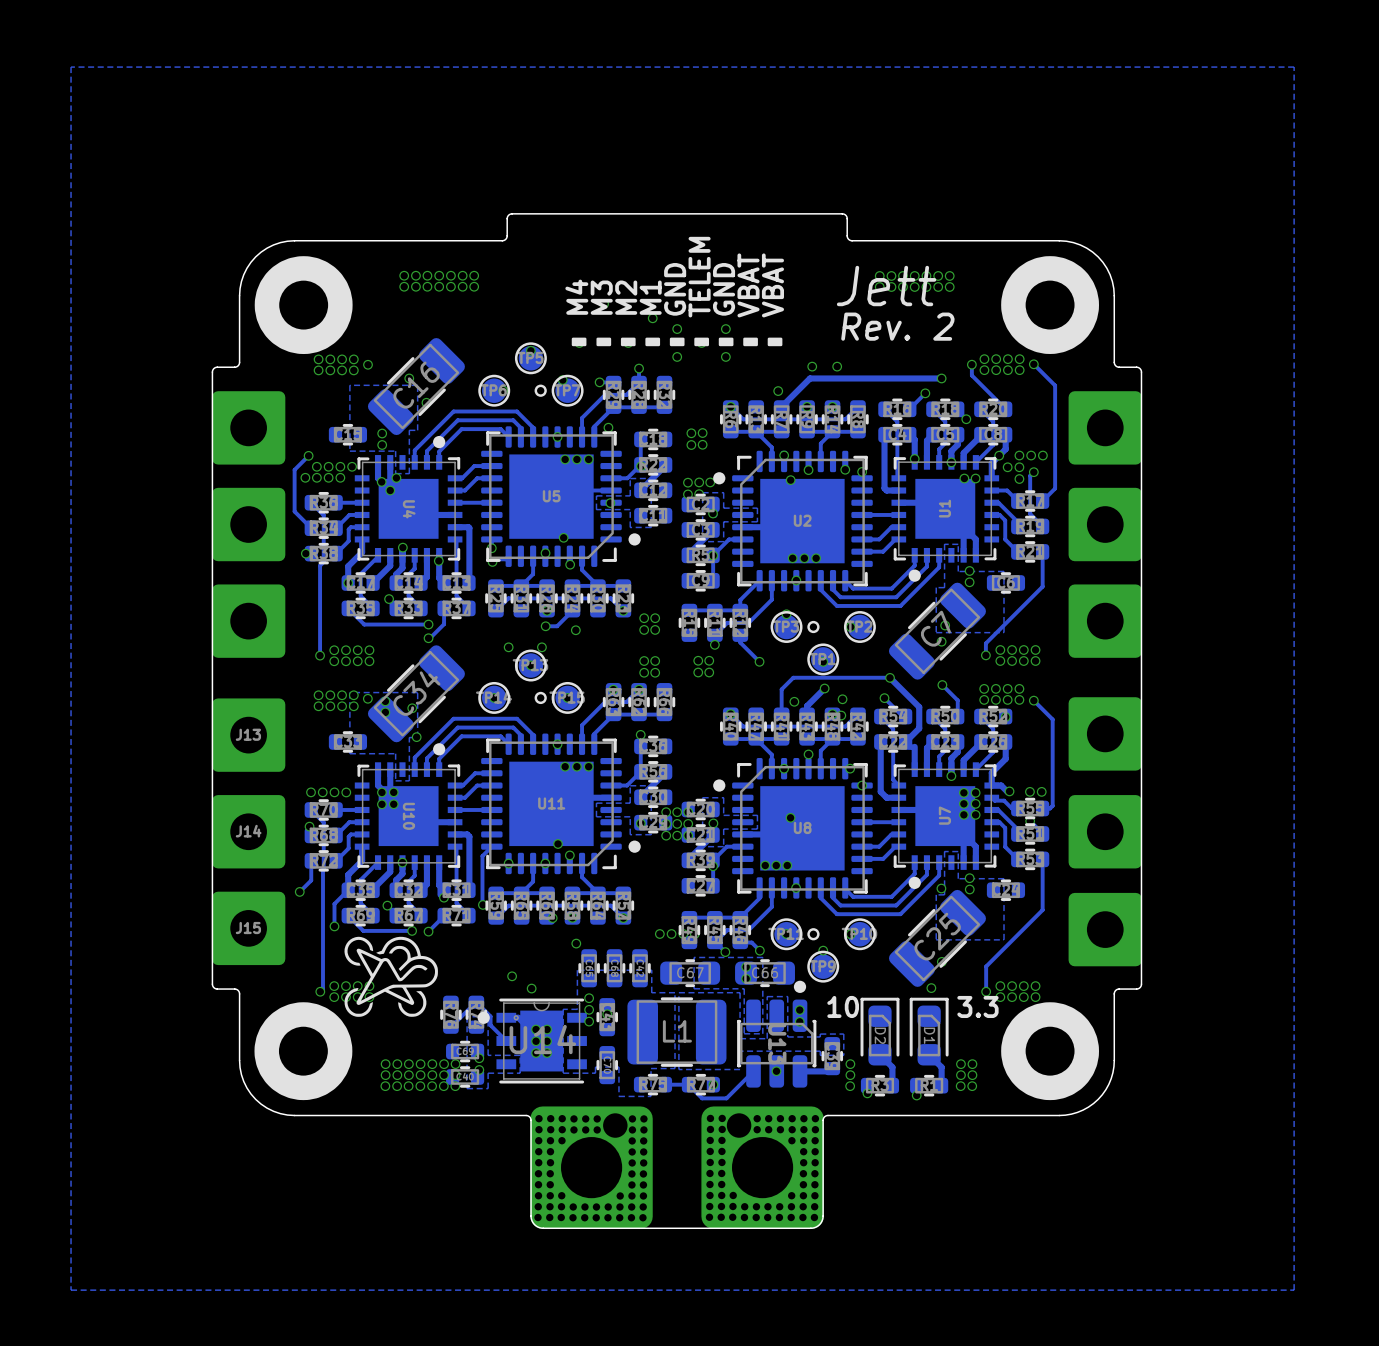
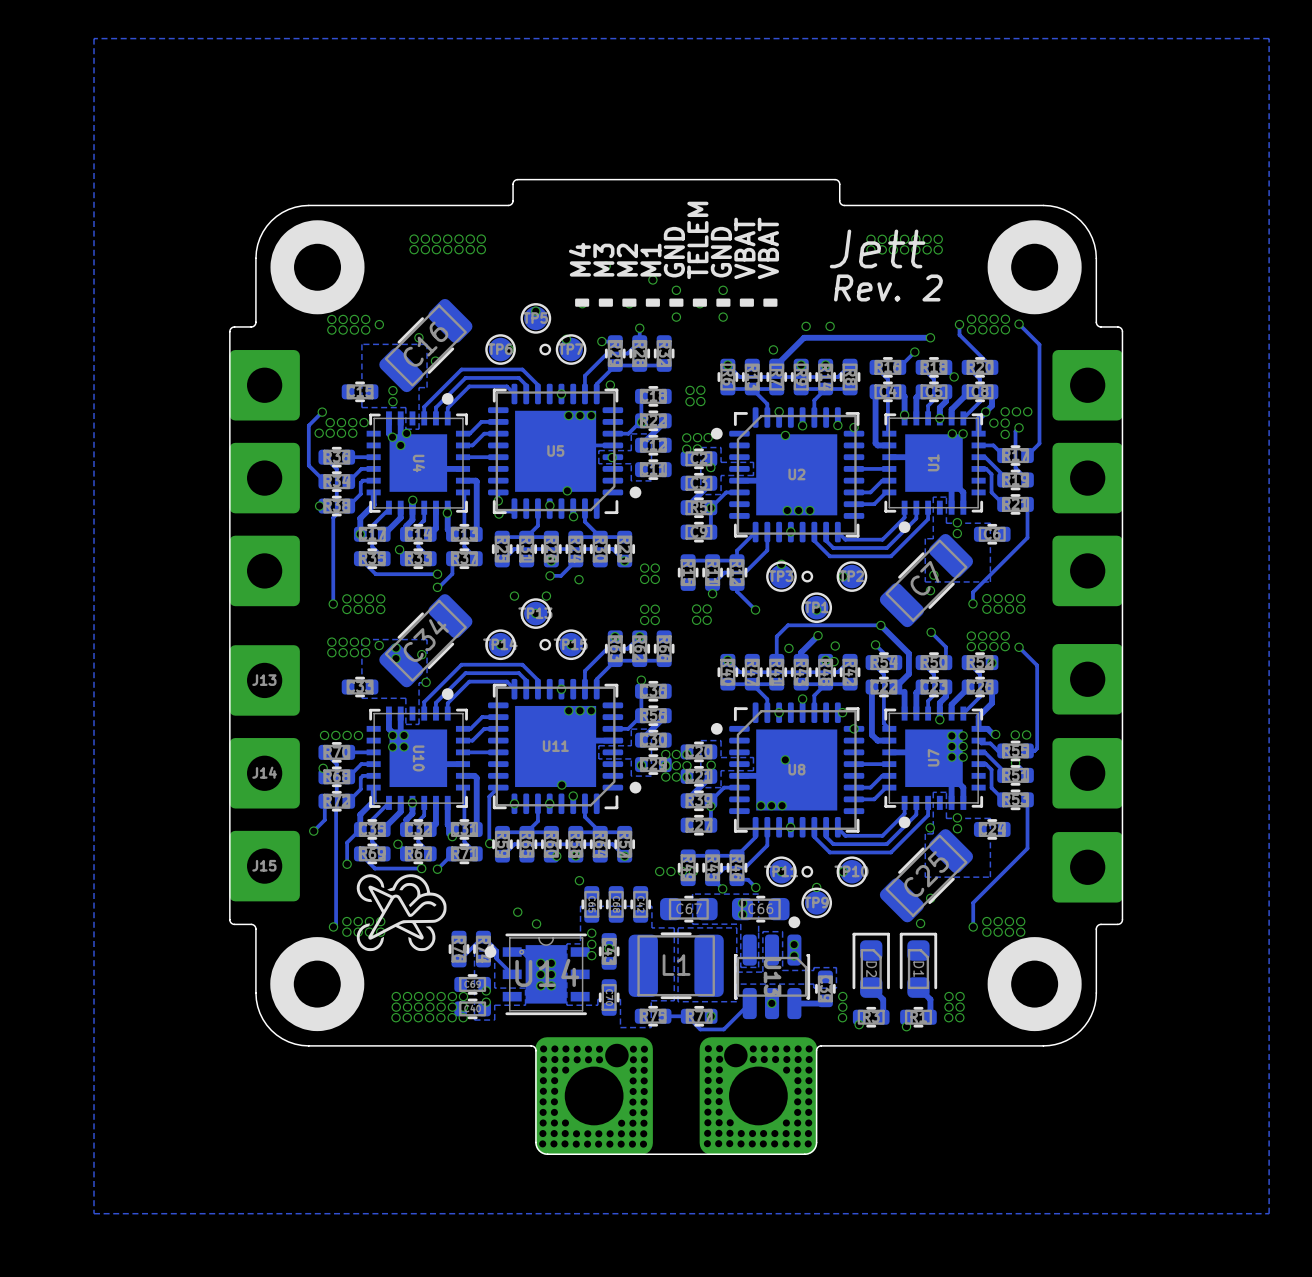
text: 10 (843, 1006) -> none
text: 3.3 (977, 1006) -> none

